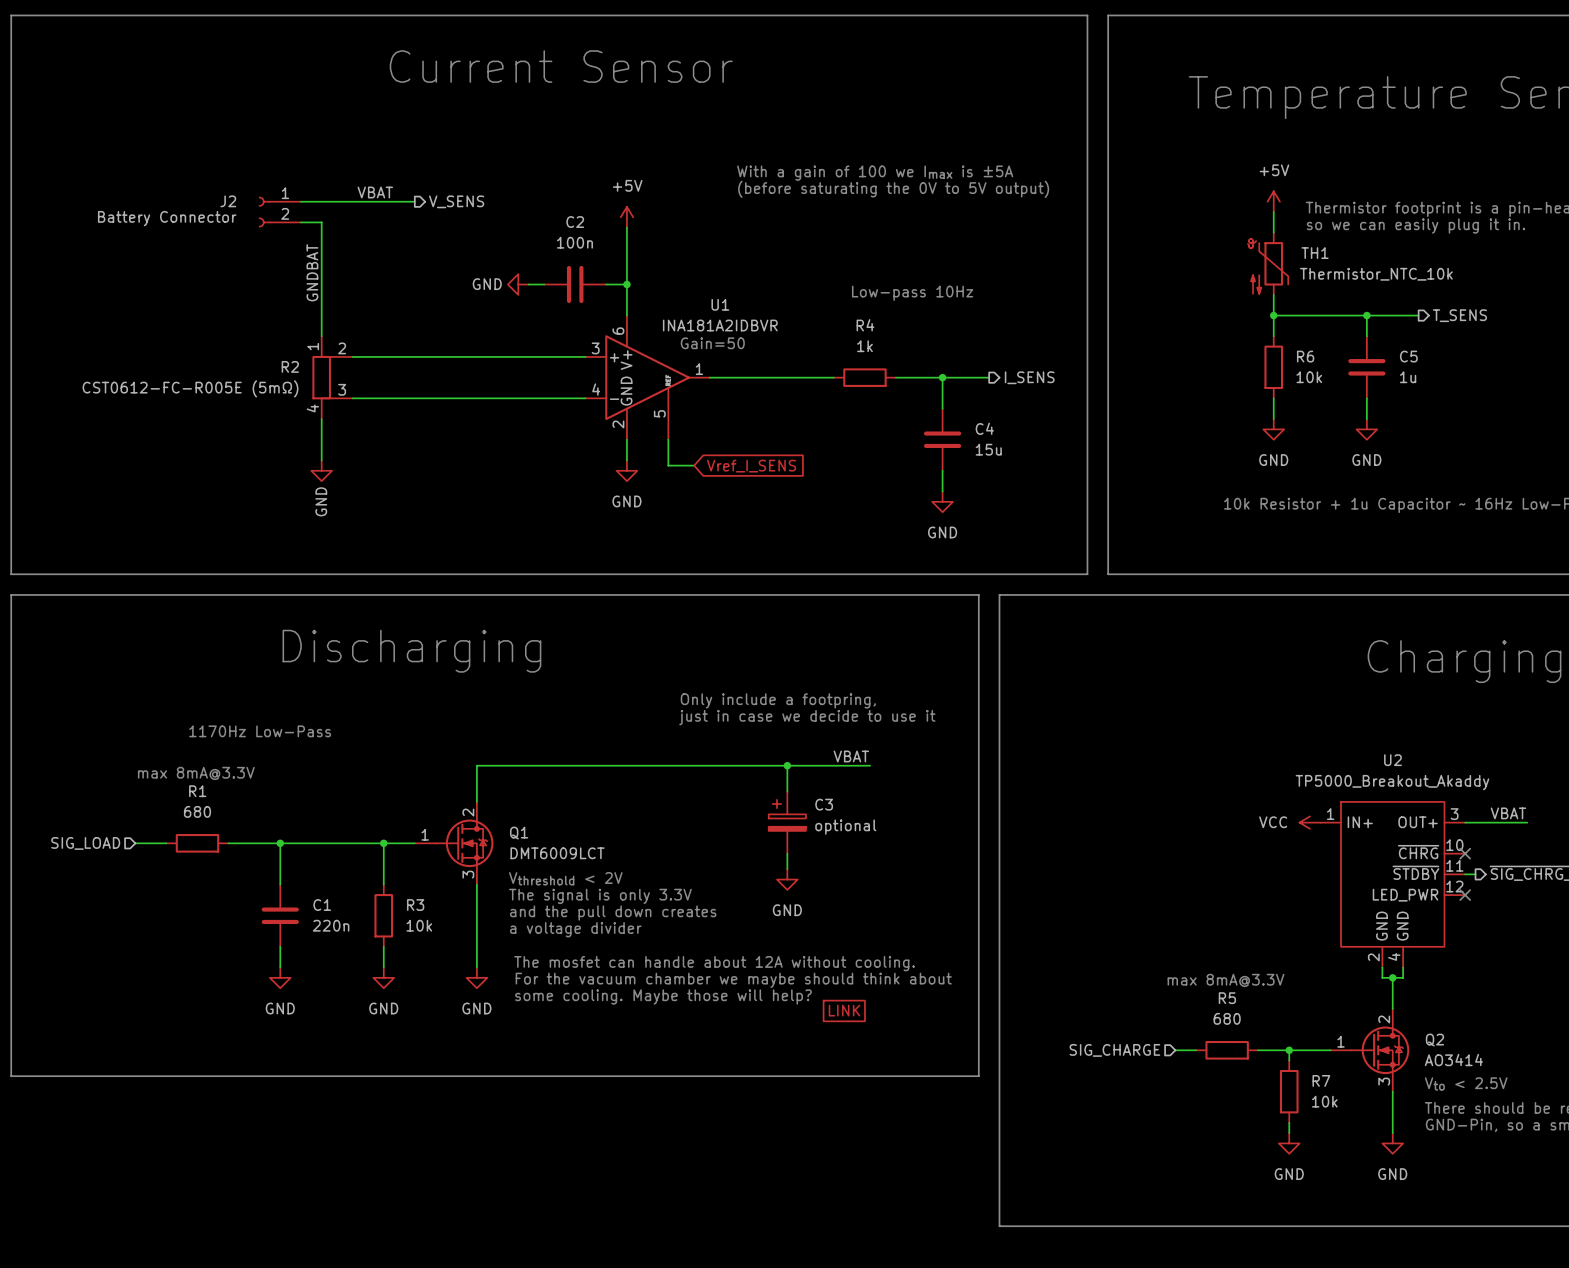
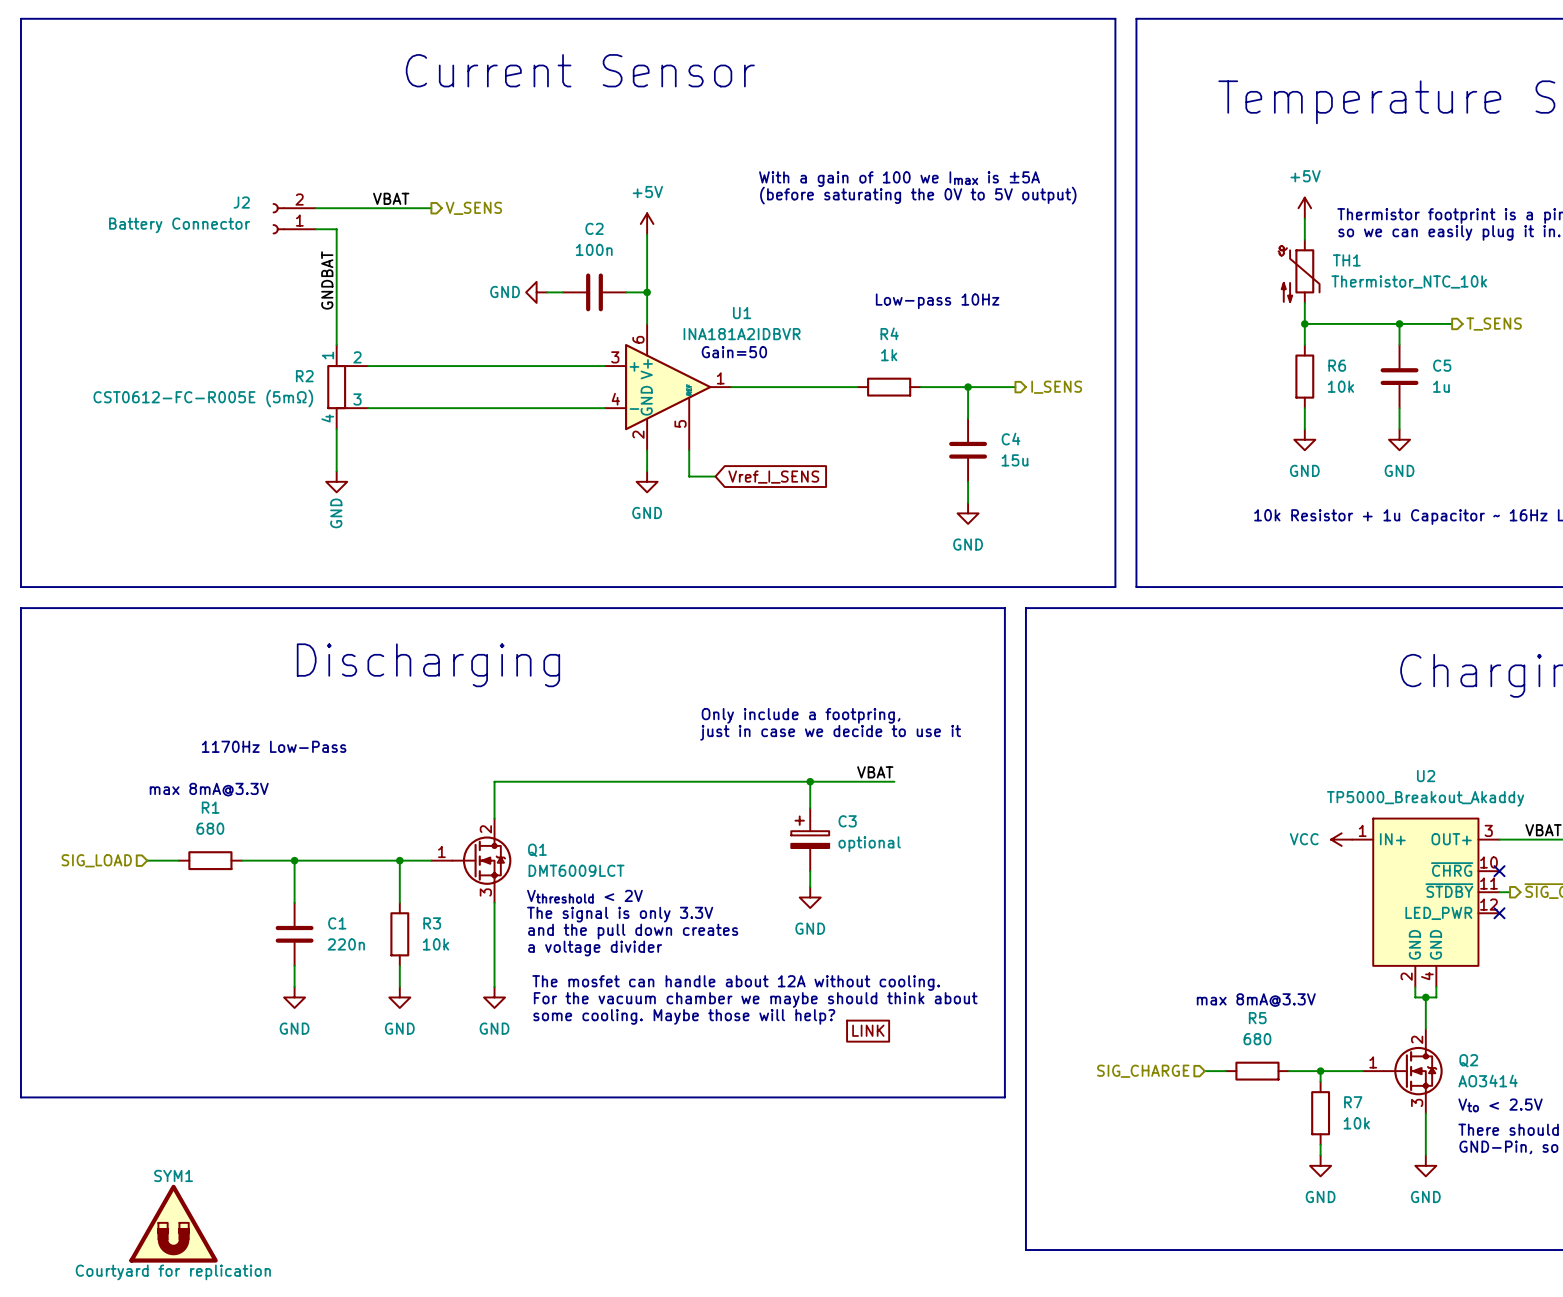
J2 flip: as is (264, 212) -> up-down (278, 218)
SYM1: none -> Courtyard for replication (173, 1223)

